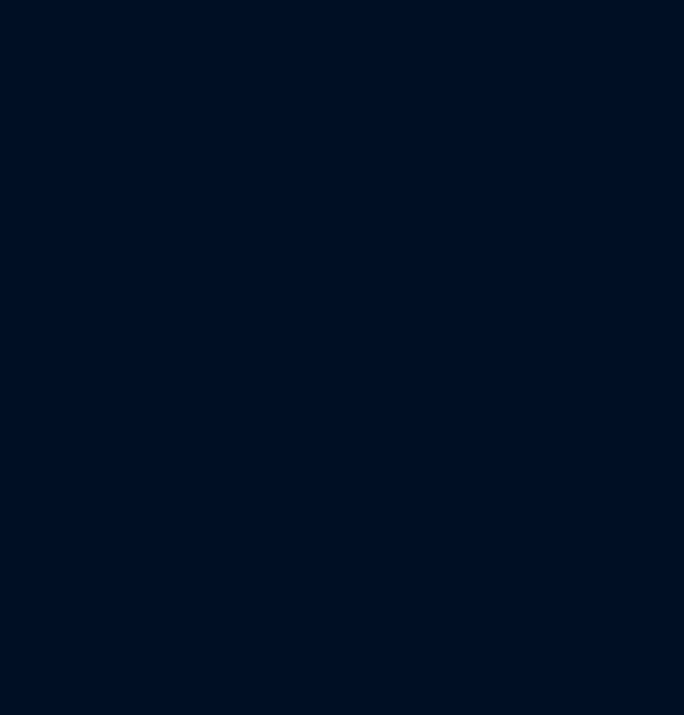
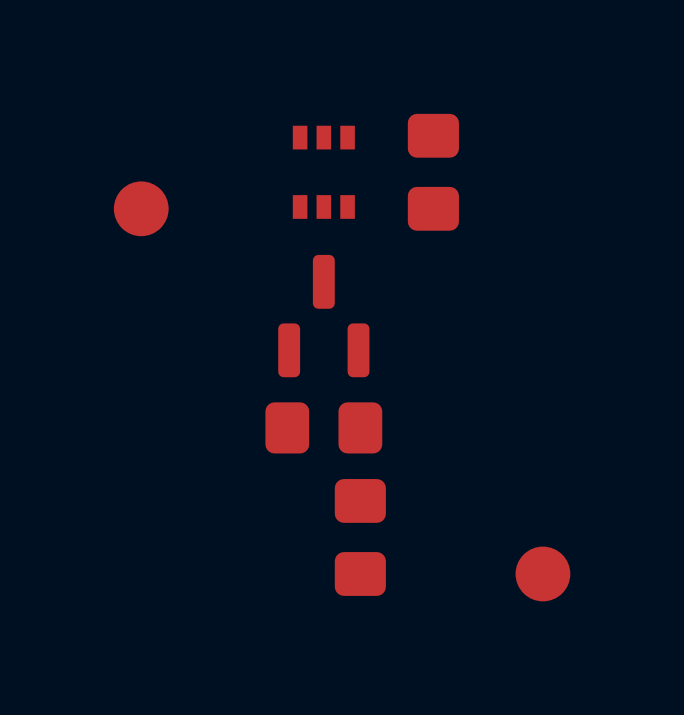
part: none -> (323, 172)
part: none -> (433, 172)
part: none -> (141, 208)
part: none -> (323, 316)
part: none -> (323, 427)
part: none -> (360, 537)
part: none -> (542, 573)

